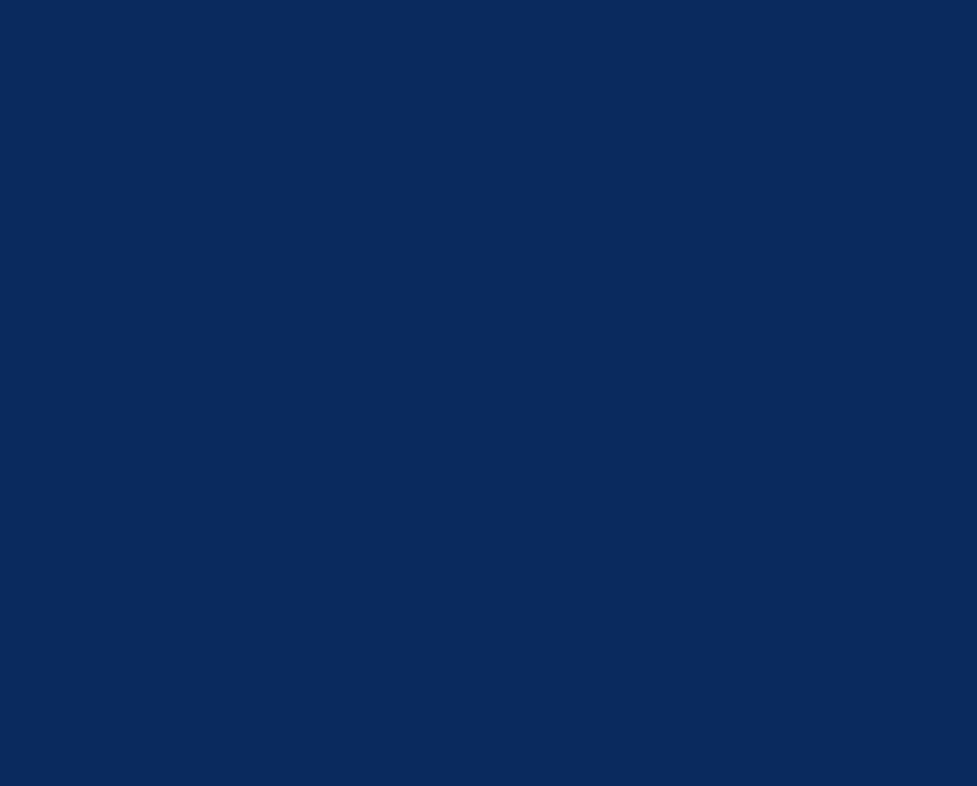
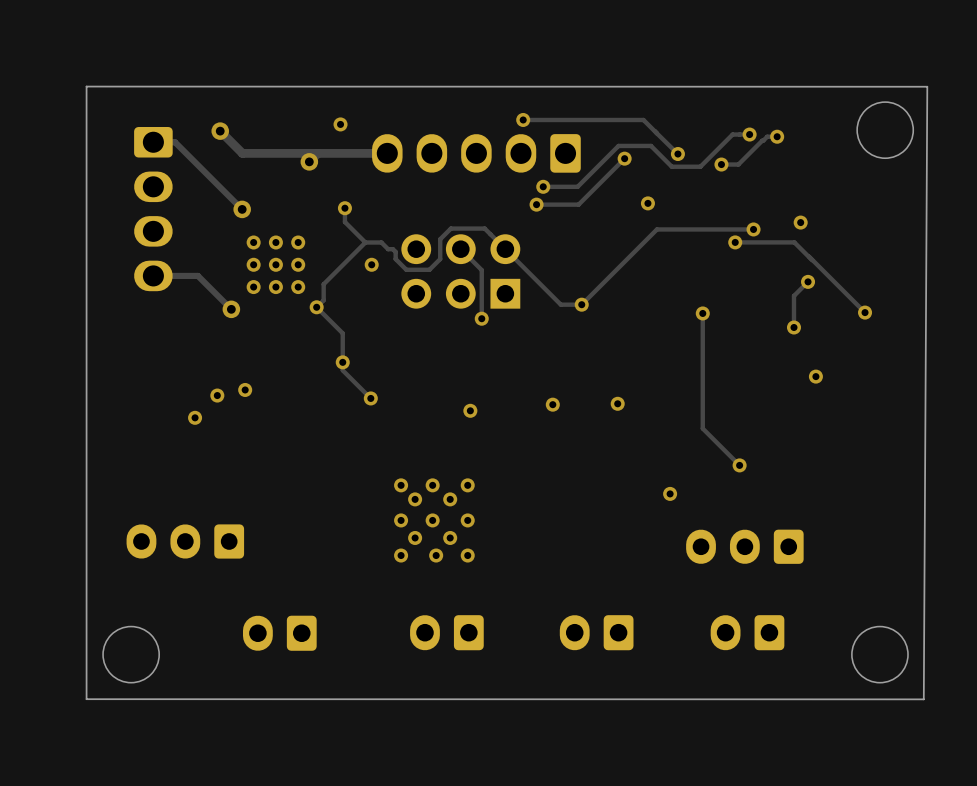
board edge: none -> (86, 86) (86, 699) (923, 699) (927, 86) (86, 86)
round board edge: none -> [856, 101, 914, 159]
track: none -> (523, 119) (643, 119) (656, 133)
via: none -> (523, 119)
via: none -> (340, 124)
track: none -> (220, 131) (242, 153) (387, 153)
via: none -> (220, 131)
track: none -> (656, 133) (677, 154)
track: none -> (749, 134) (732, 134) (700, 166) (671, 166) (651, 145) (618, 145) (577, 186) (543, 186)
via: none -> (749, 134)
track: none -> (777, 136) (767, 136) (738, 164) (721, 164)
via: none -> (777, 136)
track: none -> (153, 142) (175, 142) (242, 209)
part: none -> (476, 153)
via: none -> (677, 154)
track: none -> (624, 158) (578, 204) (536, 204)
via: none -> (624, 158)
via: none -> (309, 161)
via: none -> (721, 164)
via: none -> (543, 186)
via: none -> (647, 203)
via: none -> (536, 204)
track: none -> (344, 208) (344, 222) (365, 242)
via: none -> (344, 208)
part: none -> (153, 209)
via: none -> (242, 209)
via: none -> (800, 222)
track: none -> (753, 229) (656, 229) (581, 304) (560, 304) (484, 228) (450, 228) (440, 239) (440, 259) (429, 269) (406, 269) (395, 259) (395, 251) (392, 249) (388, 249) (381, 242) (365, 242)
via: none -> (753, 229)
via: none -> (253, 242)
via: none -> (275, 242)
via: none -> (298, 242)
track: none -> (365, 242) (323, 284) (323, 300) (316, 307) (342, 333) (342, 370) (370, 398)
track: none -> (735, 242) (794, 242) (812, 260)
via: none -> (735, 242)
track: none -> (460, 249) (481, 270) (481, 318)
track: none -> (808, 256) (865, 312)
via: none -> (253, 264)
via: none -> (275, 264)
via: none -> (298, 264)
via: none -> (371, 264)
part: none -> (460, 271)
track: none -> (153, 275) (197, 275) (231, 309)
track: none -> (808, 281) (793, 295) (793, 327)
via: none -> (808, 281)
via: none -> (253, 287)
via: none -> (275, 287)
via: none -> (298, 287)
via: none -> (581, 304)
via: none -> (316, 307)
via: none -> (231, 309)
via: none -> (865, 312)
track: none -> (702, 313) (702, 428) (739, 465)
via: none -> (702, 313)
via: none -> (481, 318)
via: none -> (793, 327)
via: none -> (342, 362)
via: none -> (815, 376)
via: none -> (245, 389)
via: none -> (217, 395)
via: none -> (370, 398)
via: none -> (617, 403)
via: none -> (552, 404)
via: none -> (470, 410)
via: none -> (195, 417)
via: none -> (739, 465)
via: none -> (401, 485)
via: none -> (432, 485)
via: none -> (467, 485)
via: none -> (670, 493)
via: none -> (415, 499)
via: none -> (450, 499)
via: none -> (401, 520)
via: none -> (432, 520)
via: none -> (467, 520)
via: none -> (415, 537)
via: none -> (450, 537)
part: none -> (185, 541)
part: none -> (744, 546)
via: none -> (401, 555)
via: none -> (436, 555)
via: none -> (467, 555)
round board edge: none -> [102, 626, 160, 684]
round board edge: none -> [851, 626, 909, 684]
part: none -> (446, 632)
part: none -> (596, 632)
part: none -> (747, 632)
part: none -> (279, 633)

